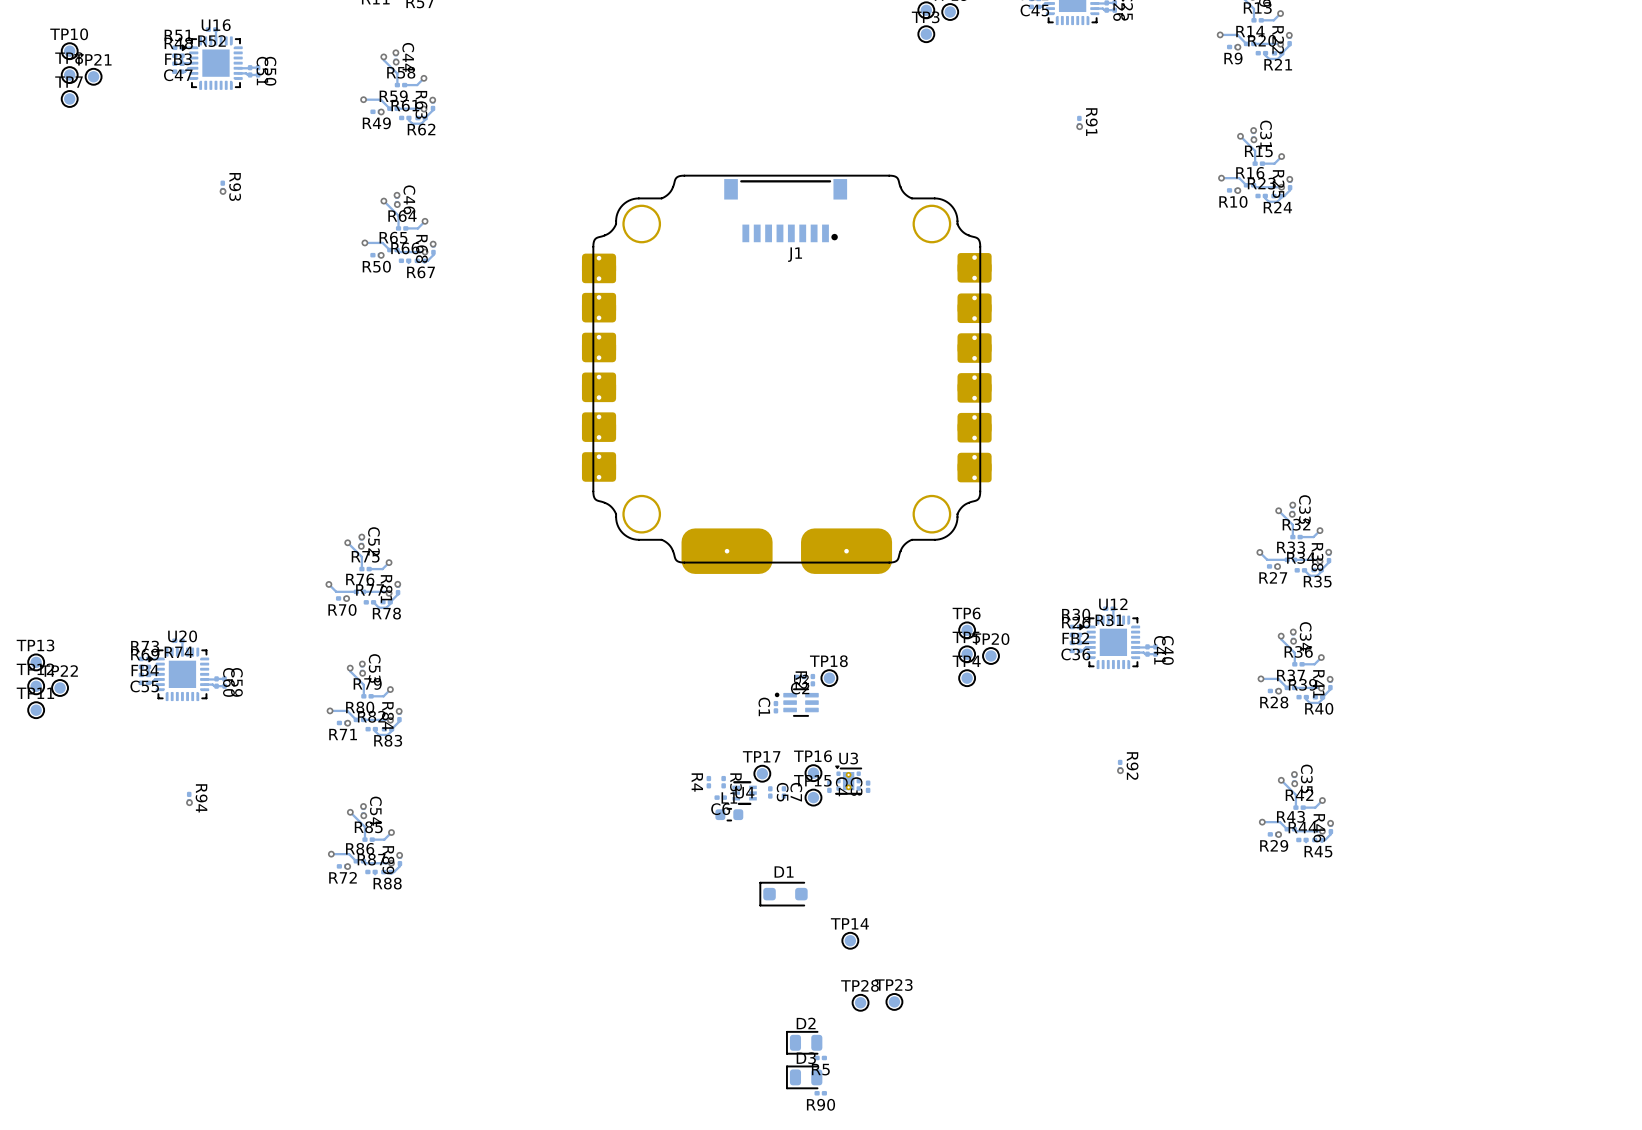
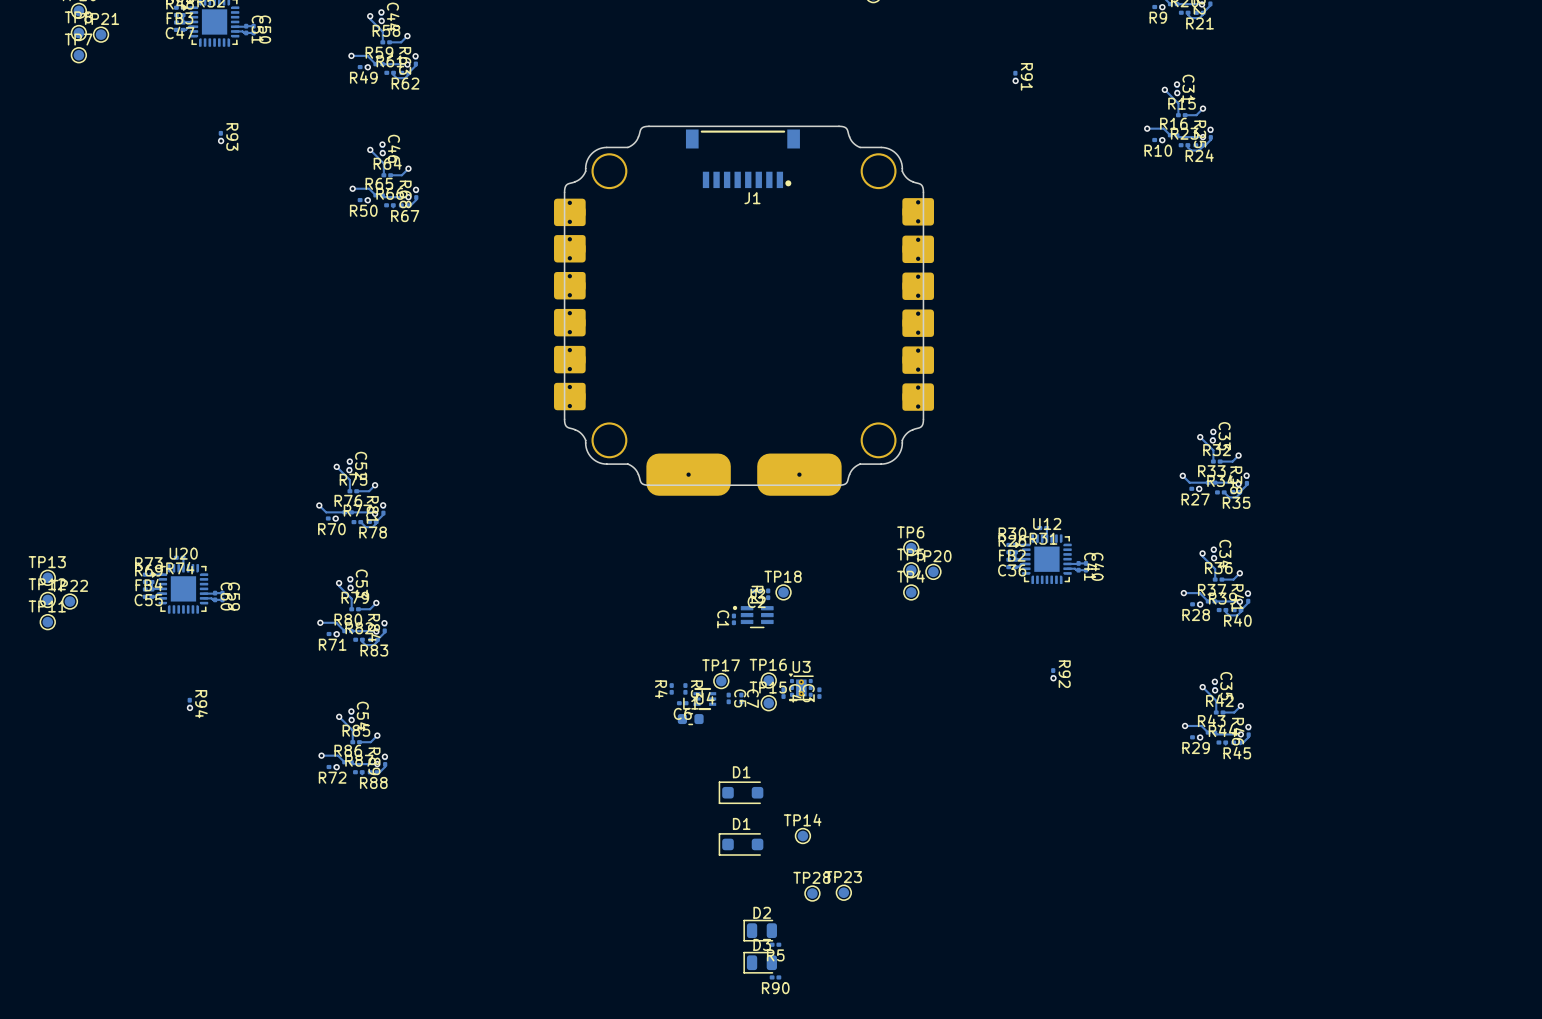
D1: none -> (741, 844)

